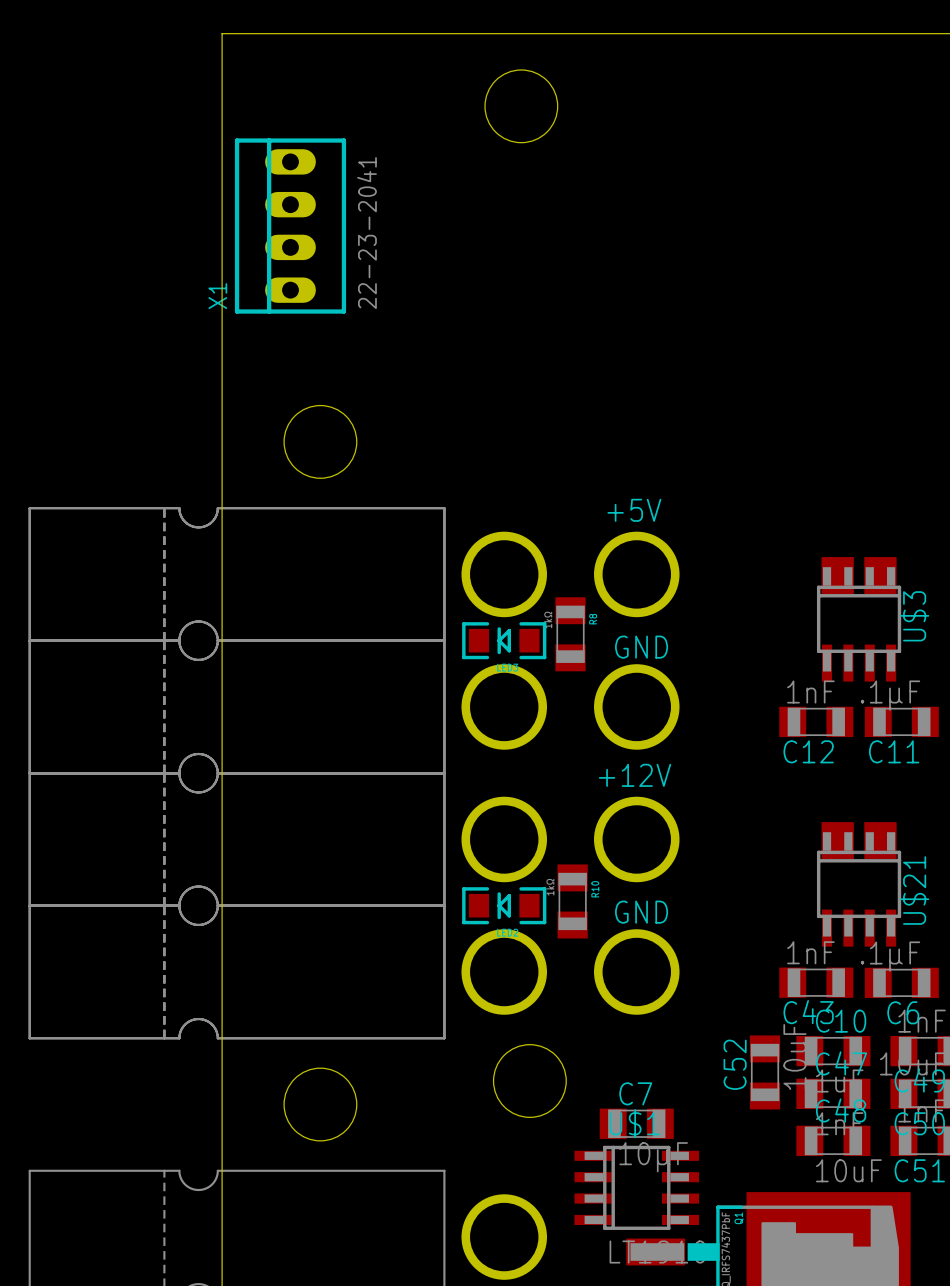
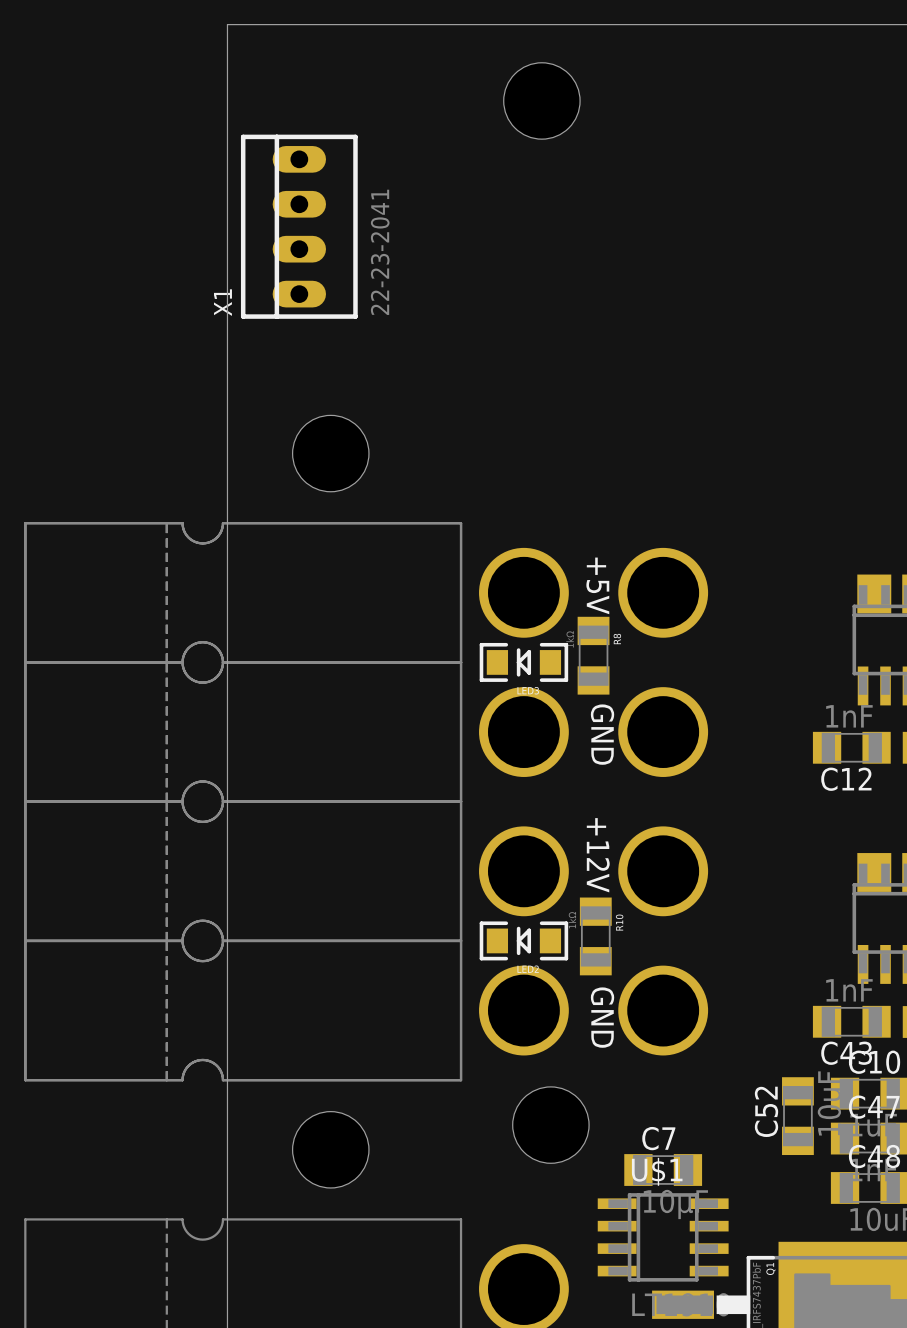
text rotation: 0° (634, 510) -> 90° clockwise (597, 585)
text position: +5V (634, 510) -> +5V (597, 585)
text rotation: 0° (641, 647) -> 90° clockwise (602, 734)
text position: GND (641, 647) -> GND (602, 734)
text rotation: 0° (634, 775) -> 90° clockwise (598, 855)
text rotation: 0° (641, 912) -> 90° clockwise (602, 1017)
text position: GND (641, 912) -> GND (602, 1017)

